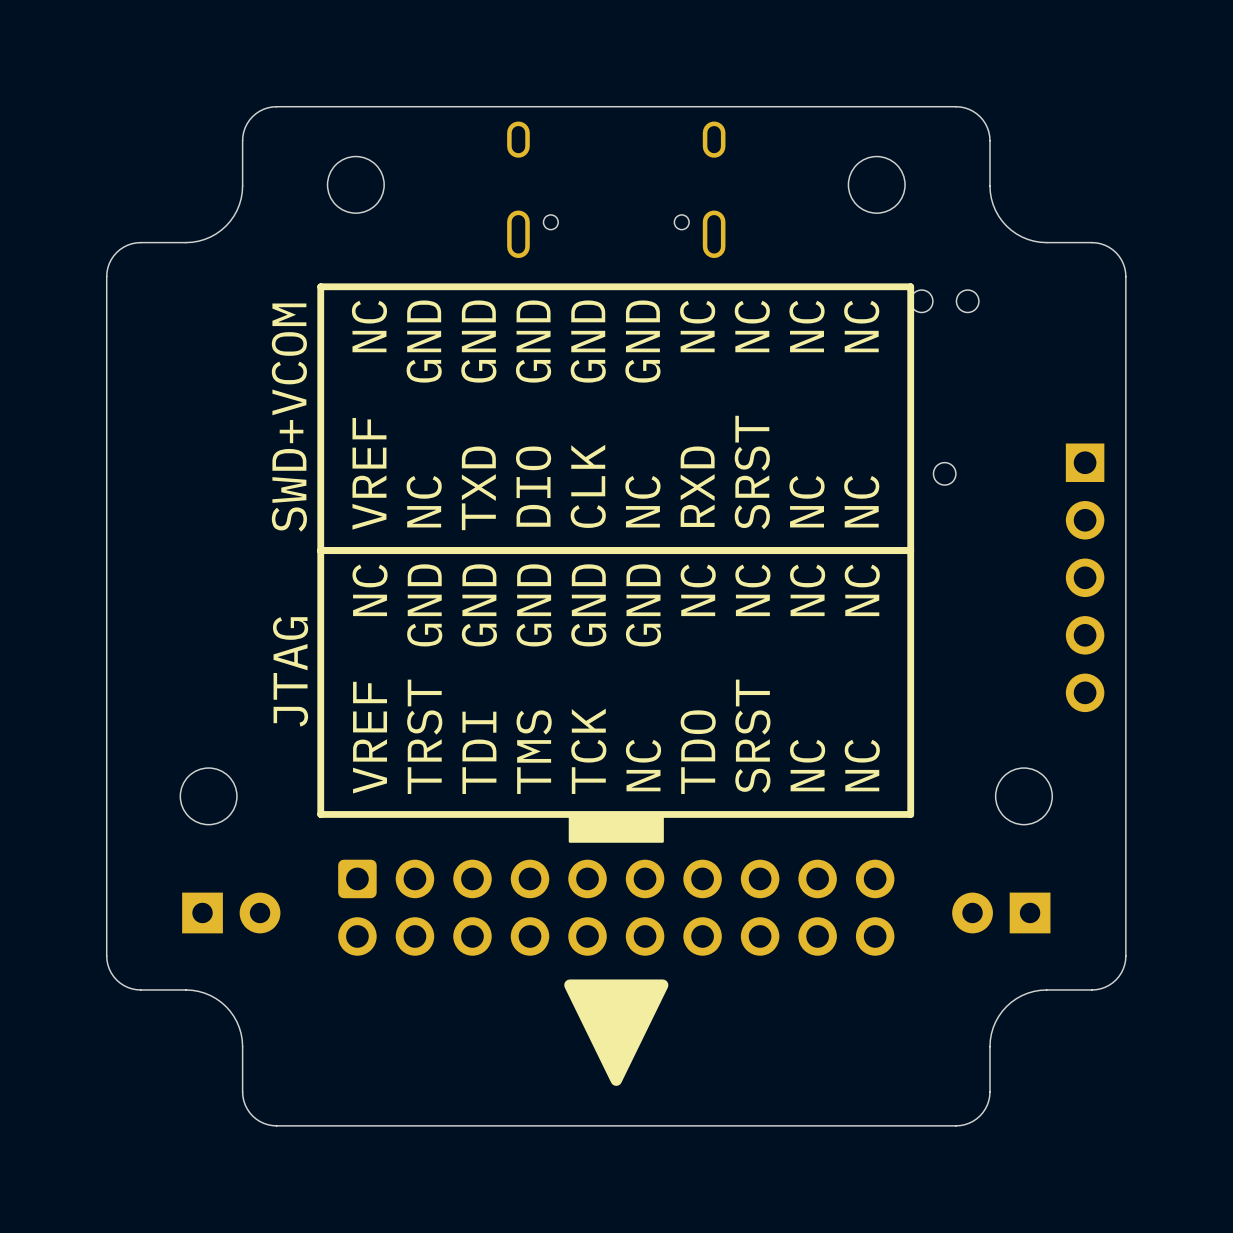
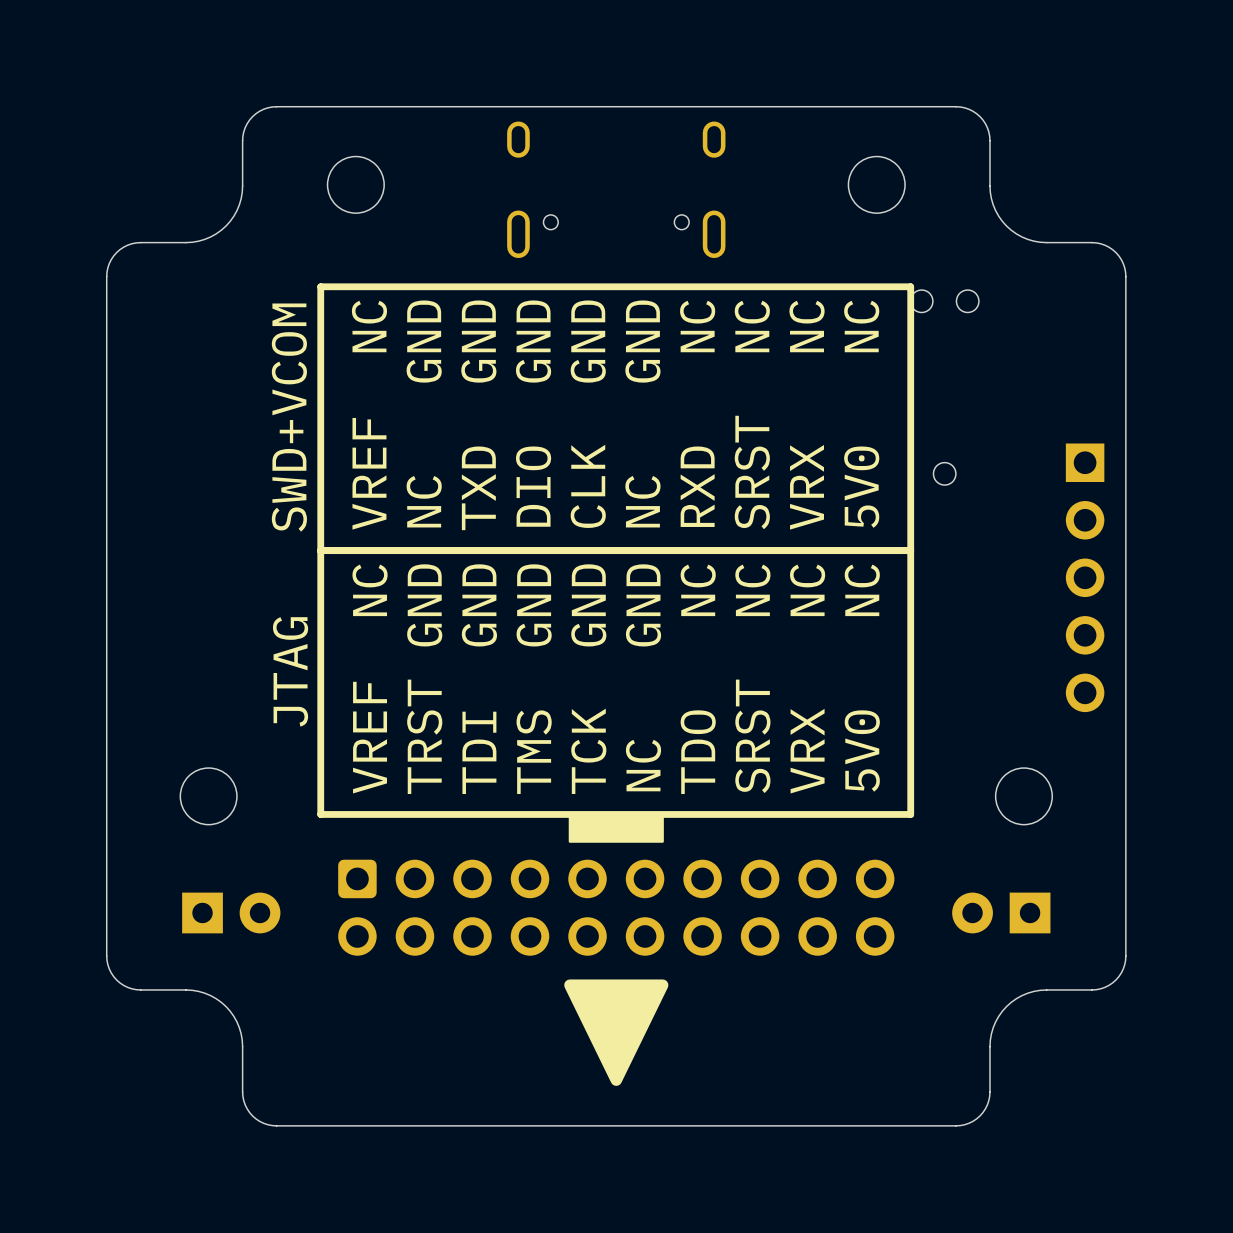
text: NC NC (807, 414) -> VRX NC (807, 415)
text: NC NC (861, 414) -> 5V0 NC (861, 414)
text: NC NC (807, 677) -> VRX NC (807, 679)
text: NC NC (862, 677) -> 5V0 NC (862, 678)

